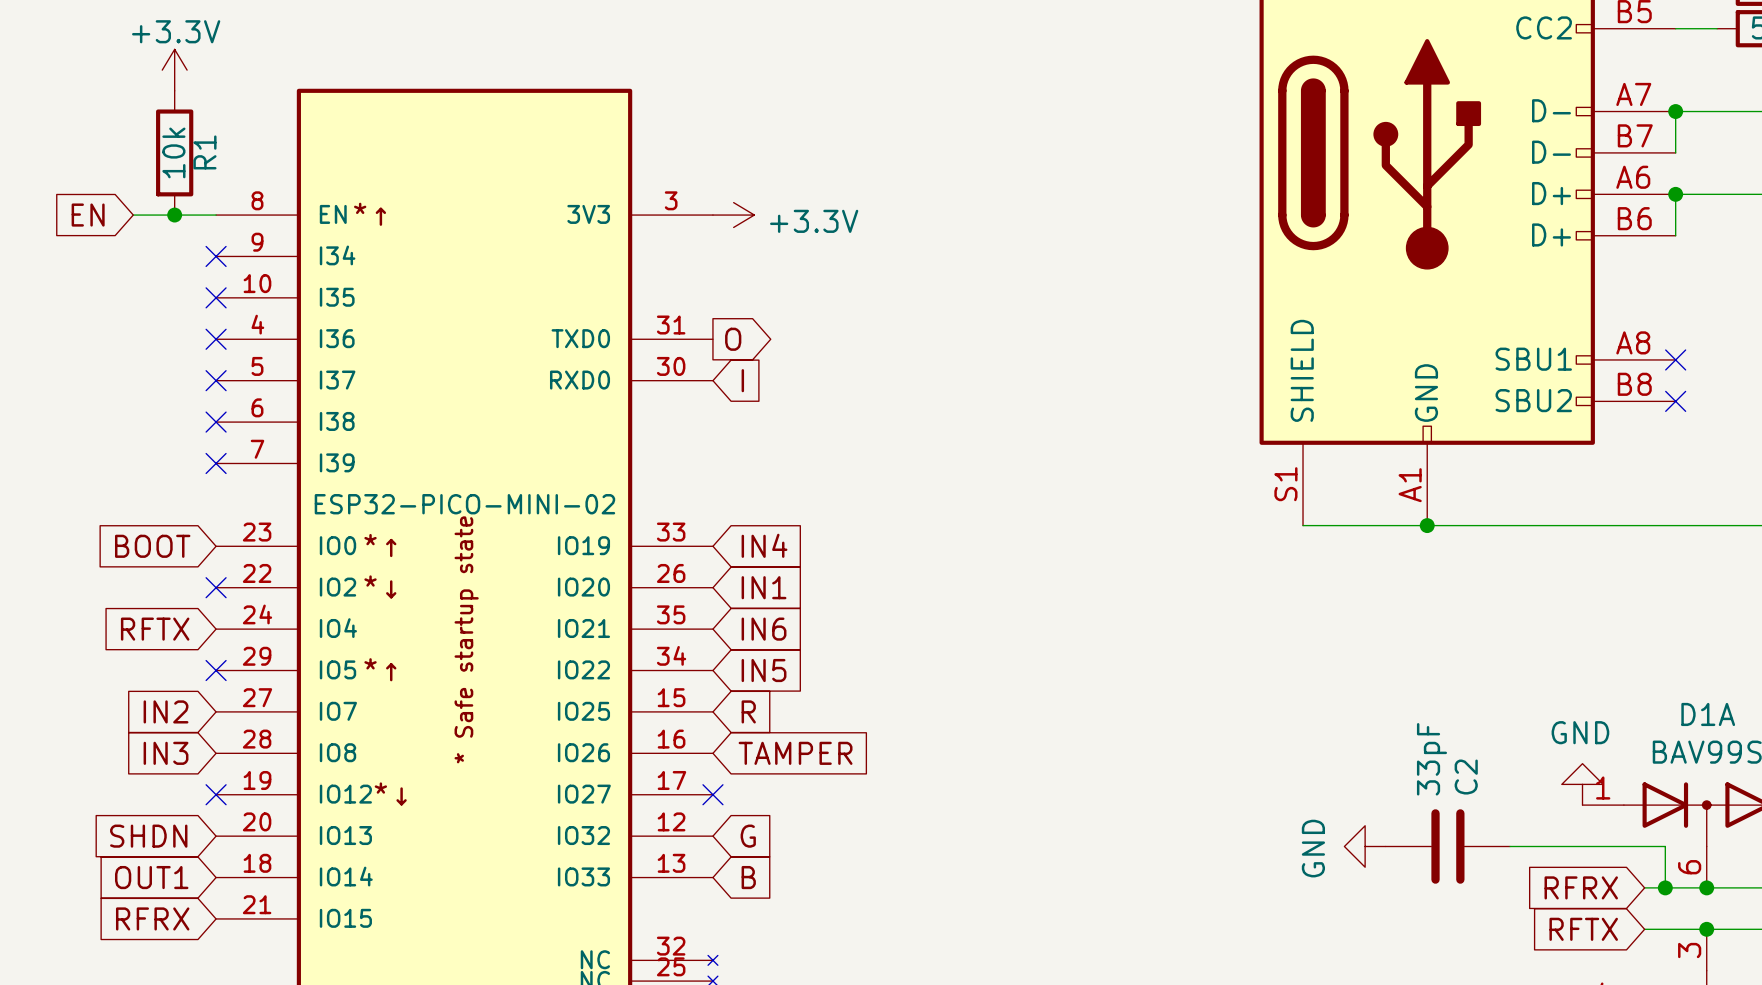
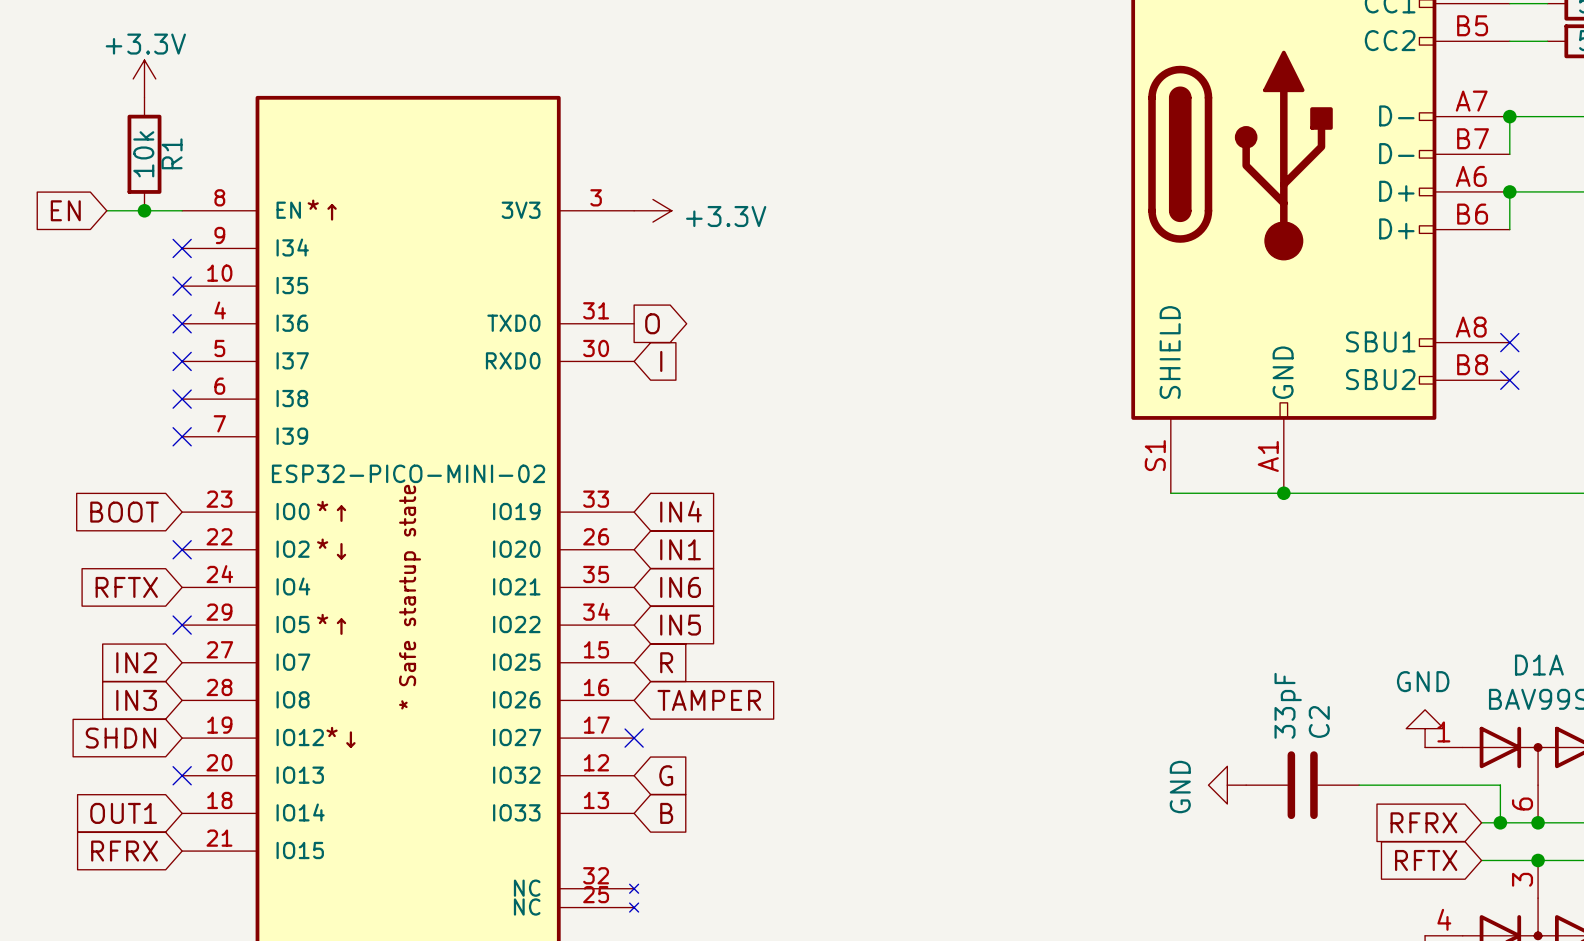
no-connect mark position: (216, 794) -> (182, 775)
global label position: SHDN (148, 836) -> SHDN (120, 738)

